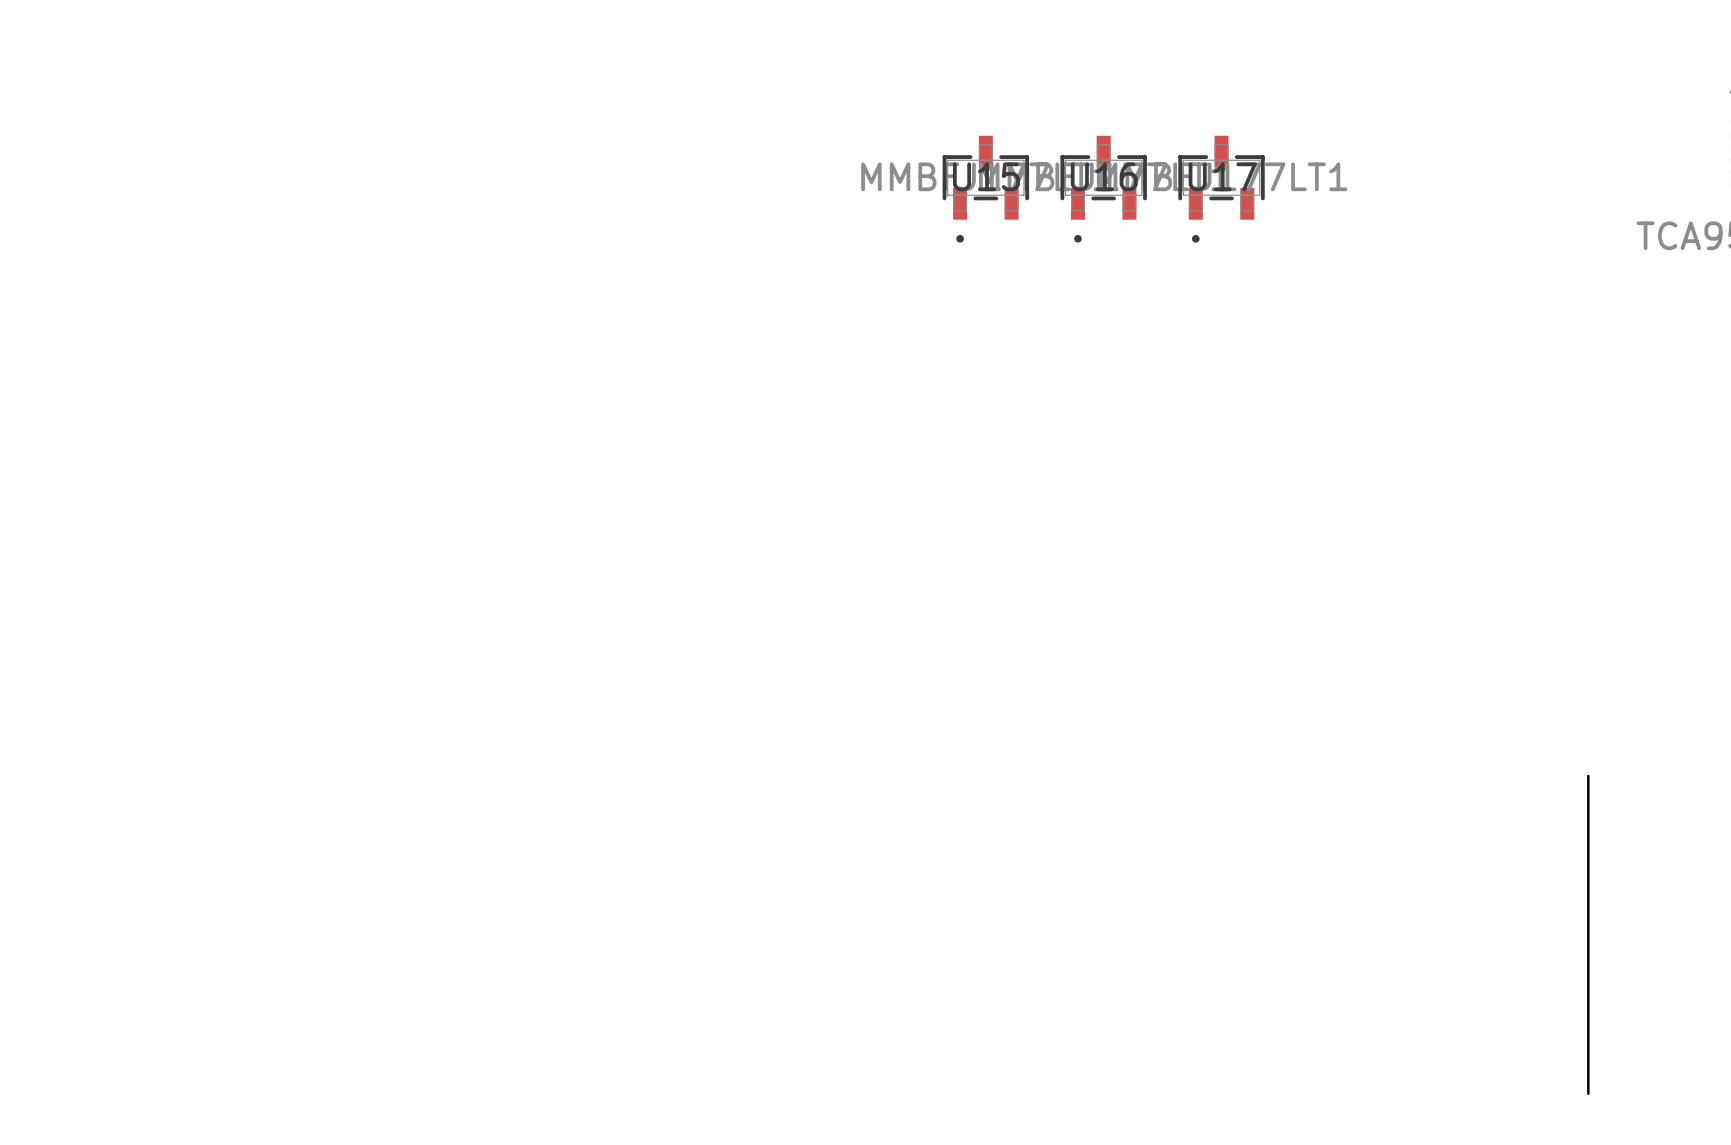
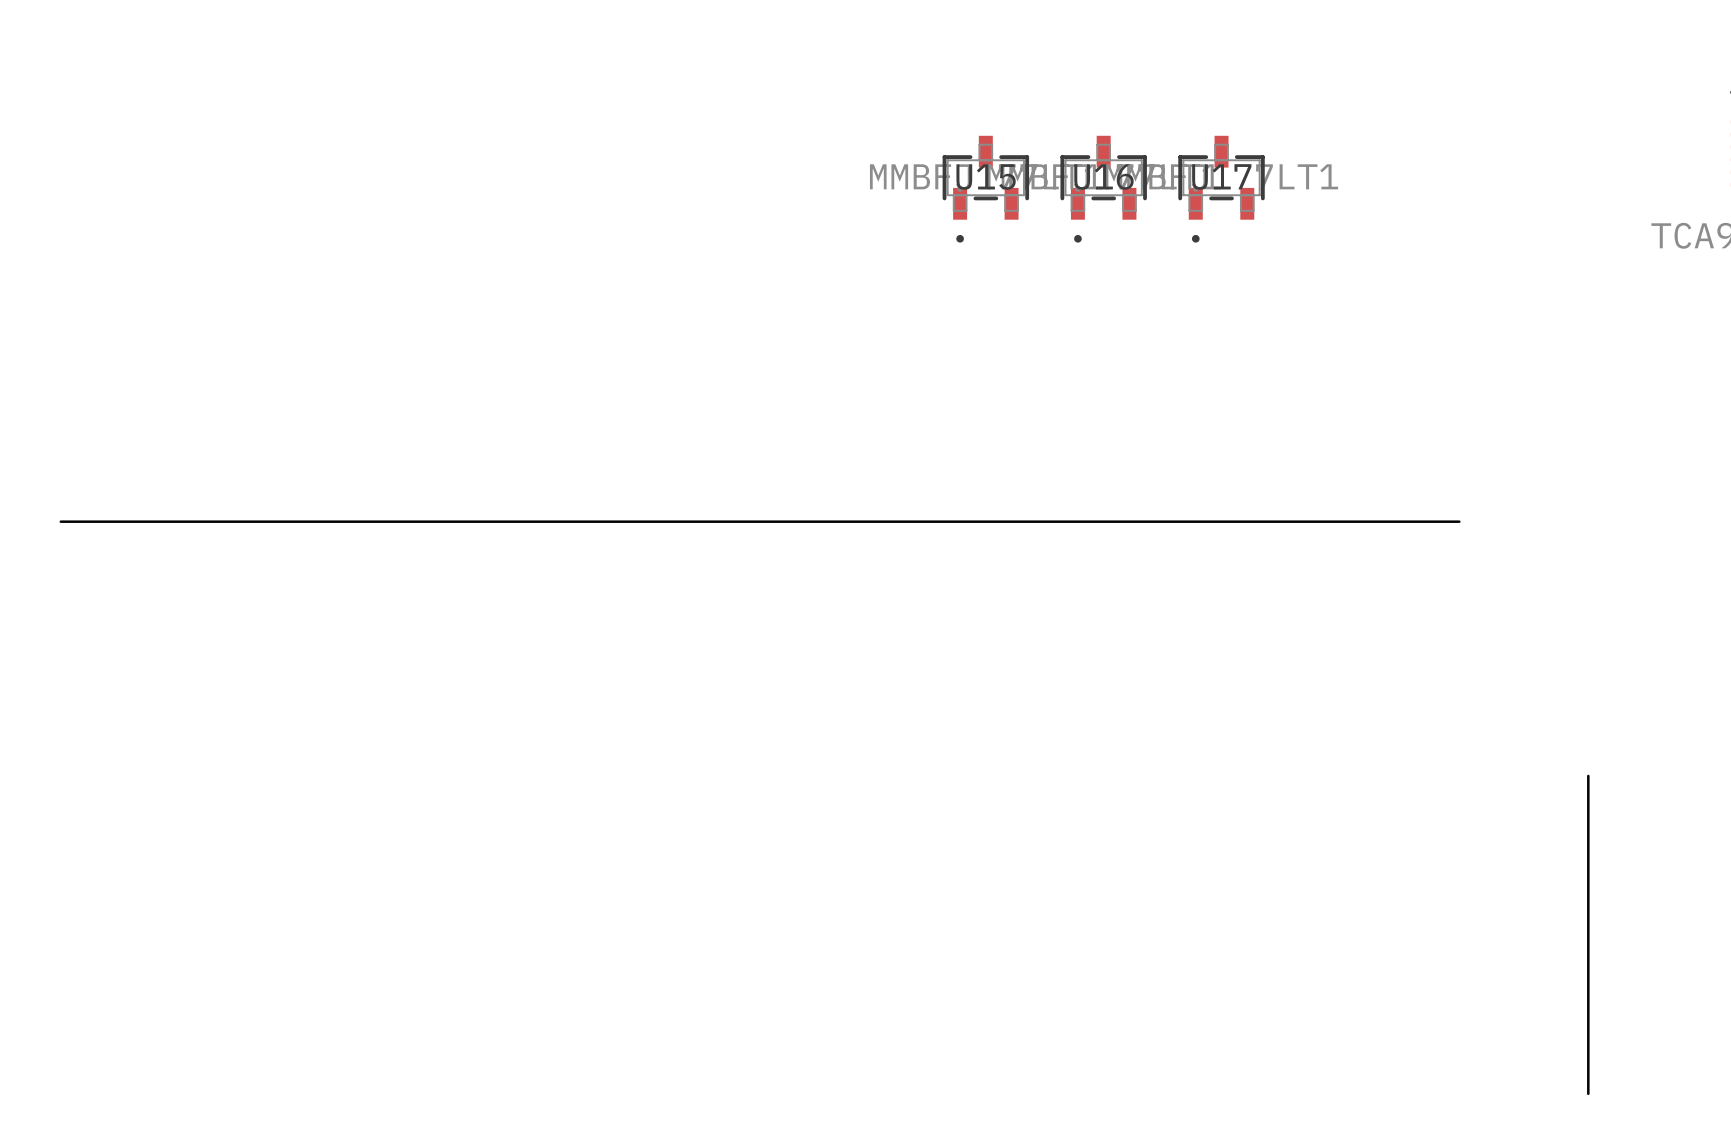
board edge: none -> (60, 521) (1459, 521)

